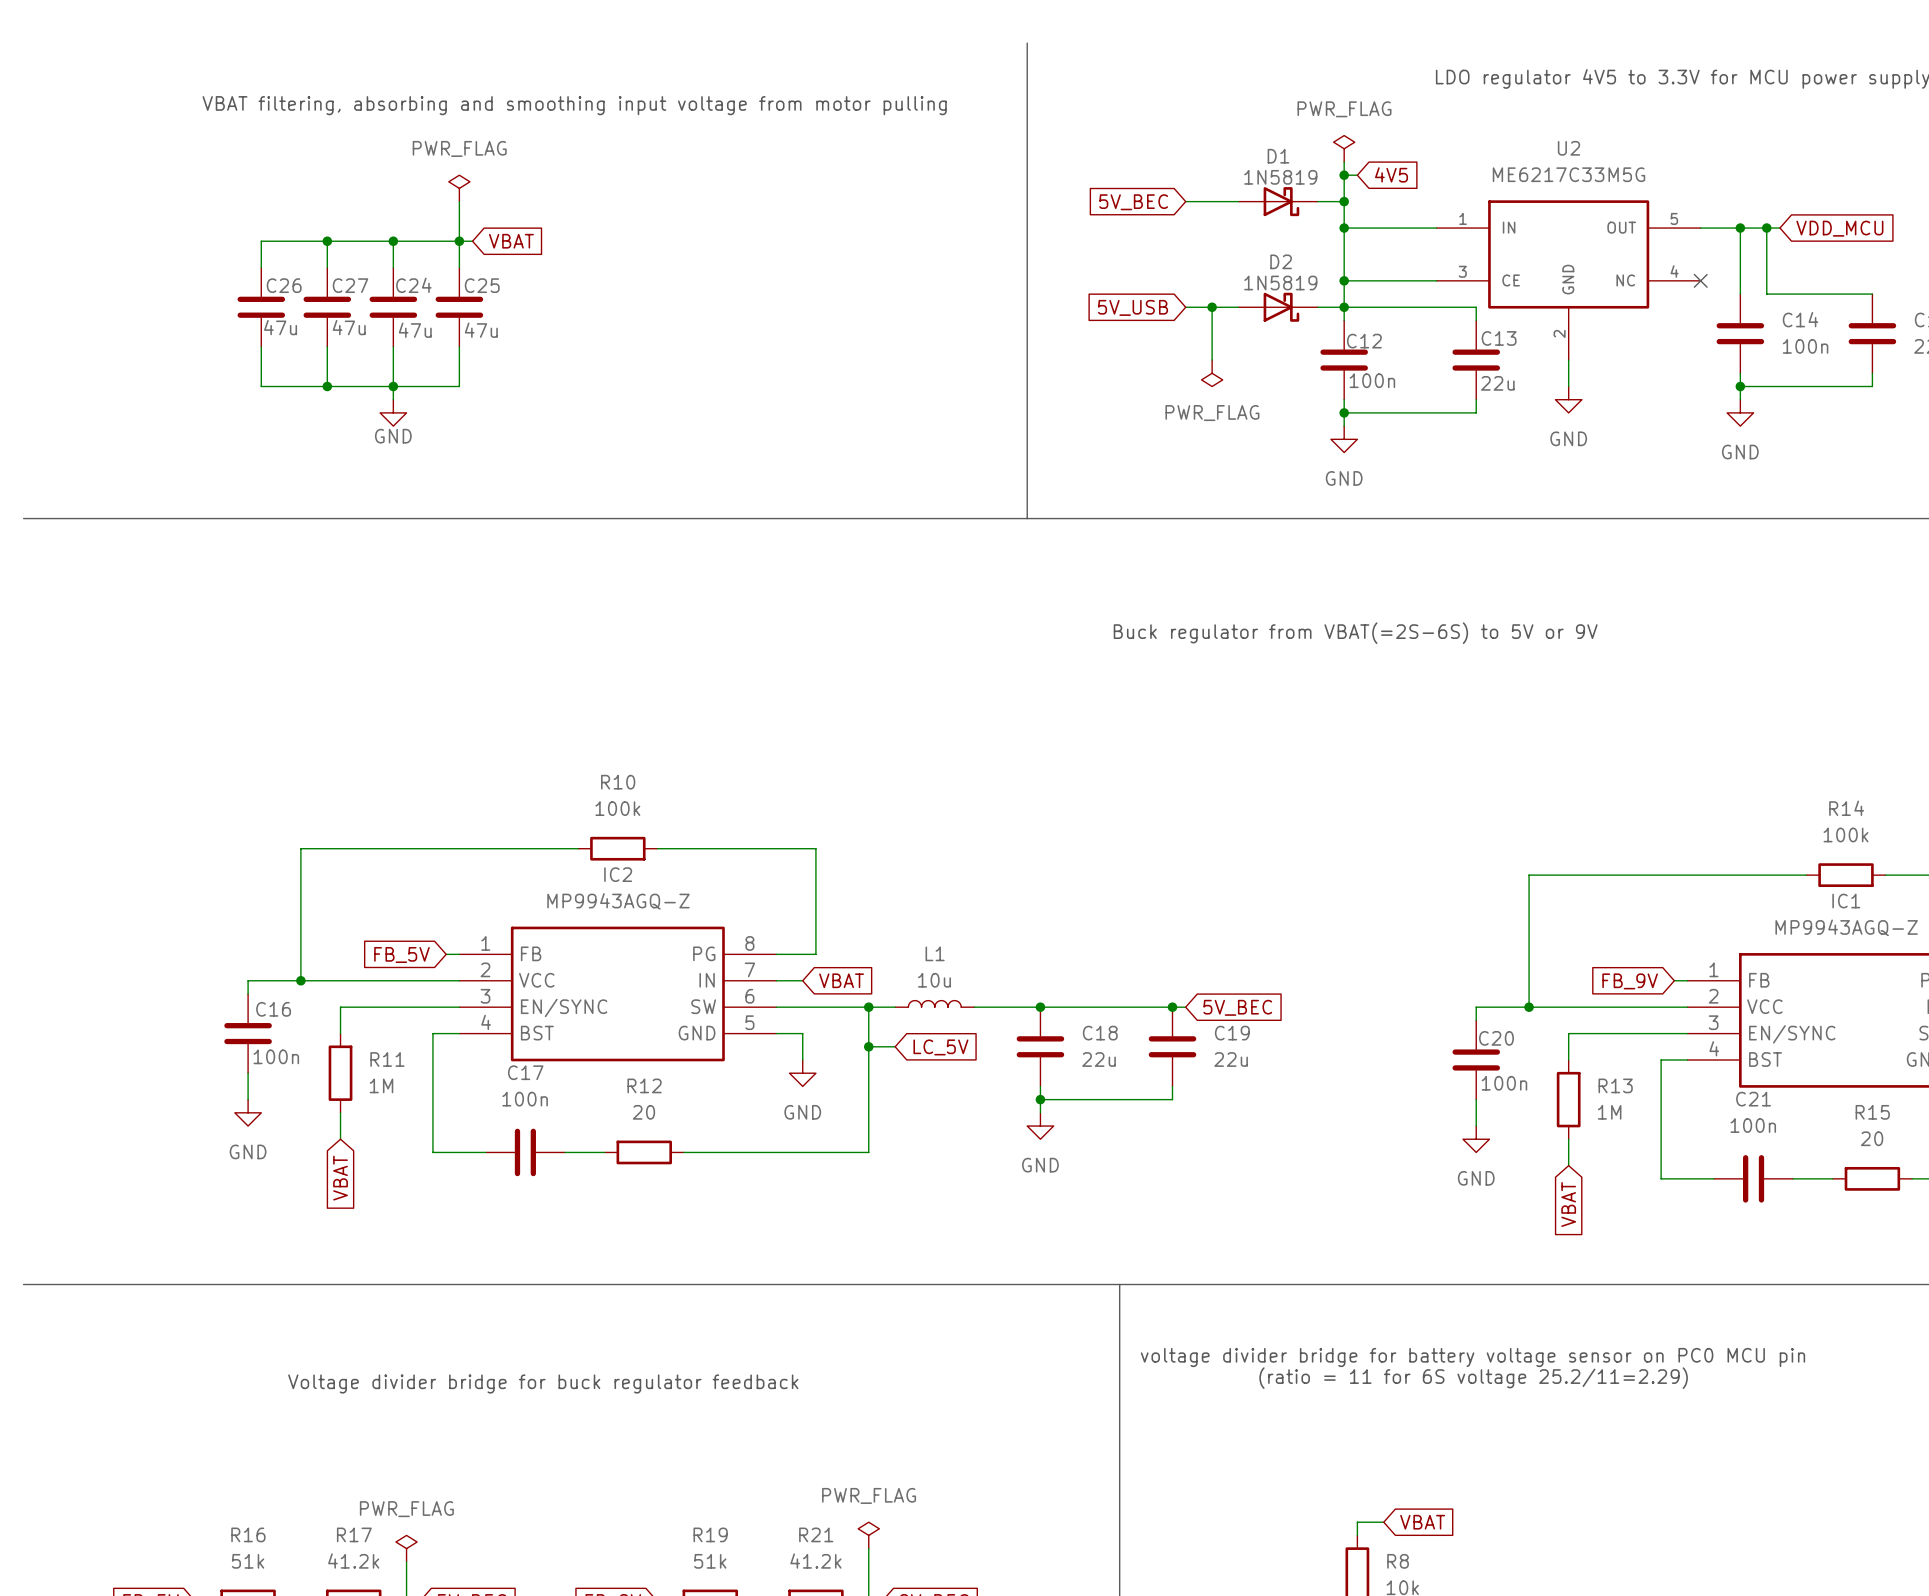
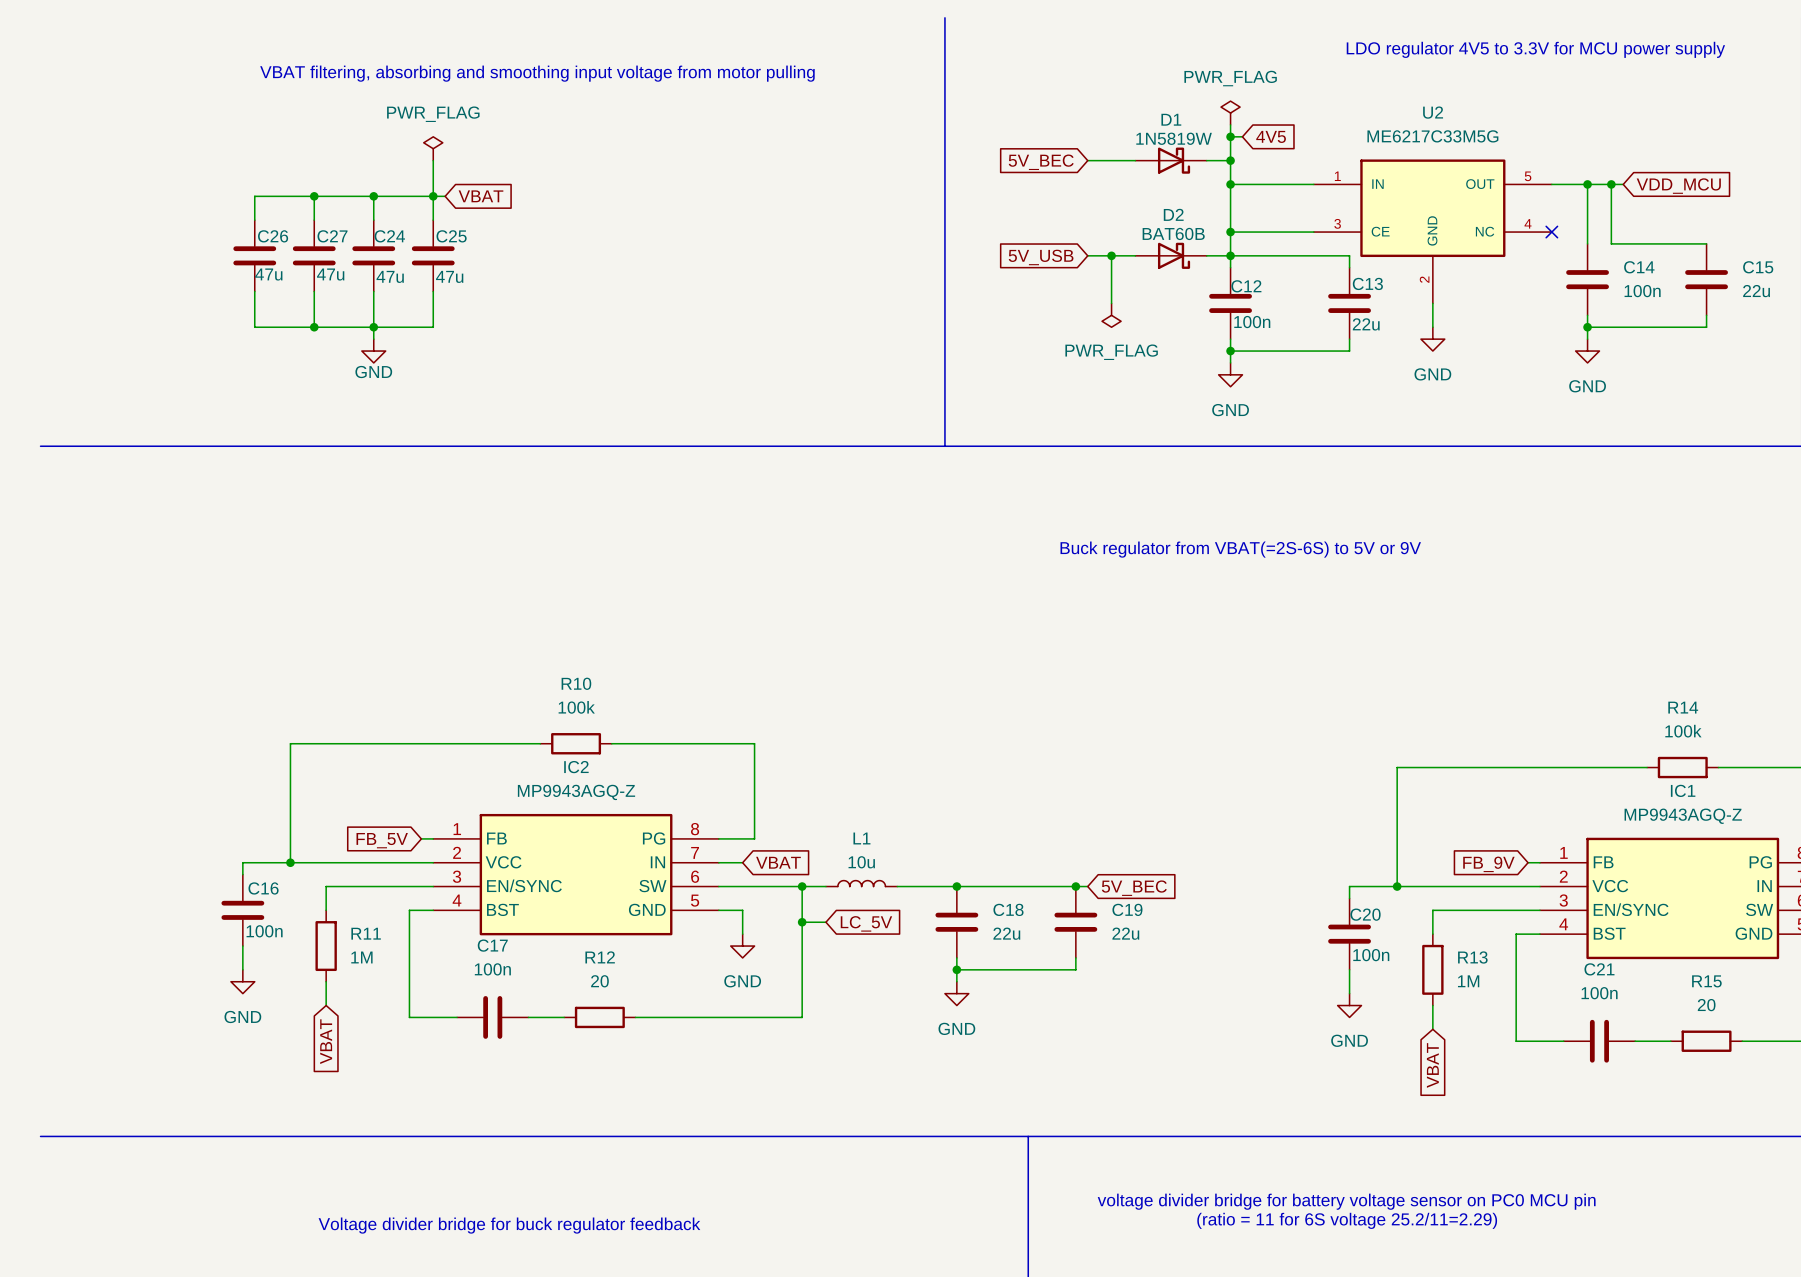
D1 value: 1N5819 (1280, 177) -> 1N5819W (1174, 138)
D2 value: 1N5819 (1280, 283) -> BAT60B (1173, 233)

